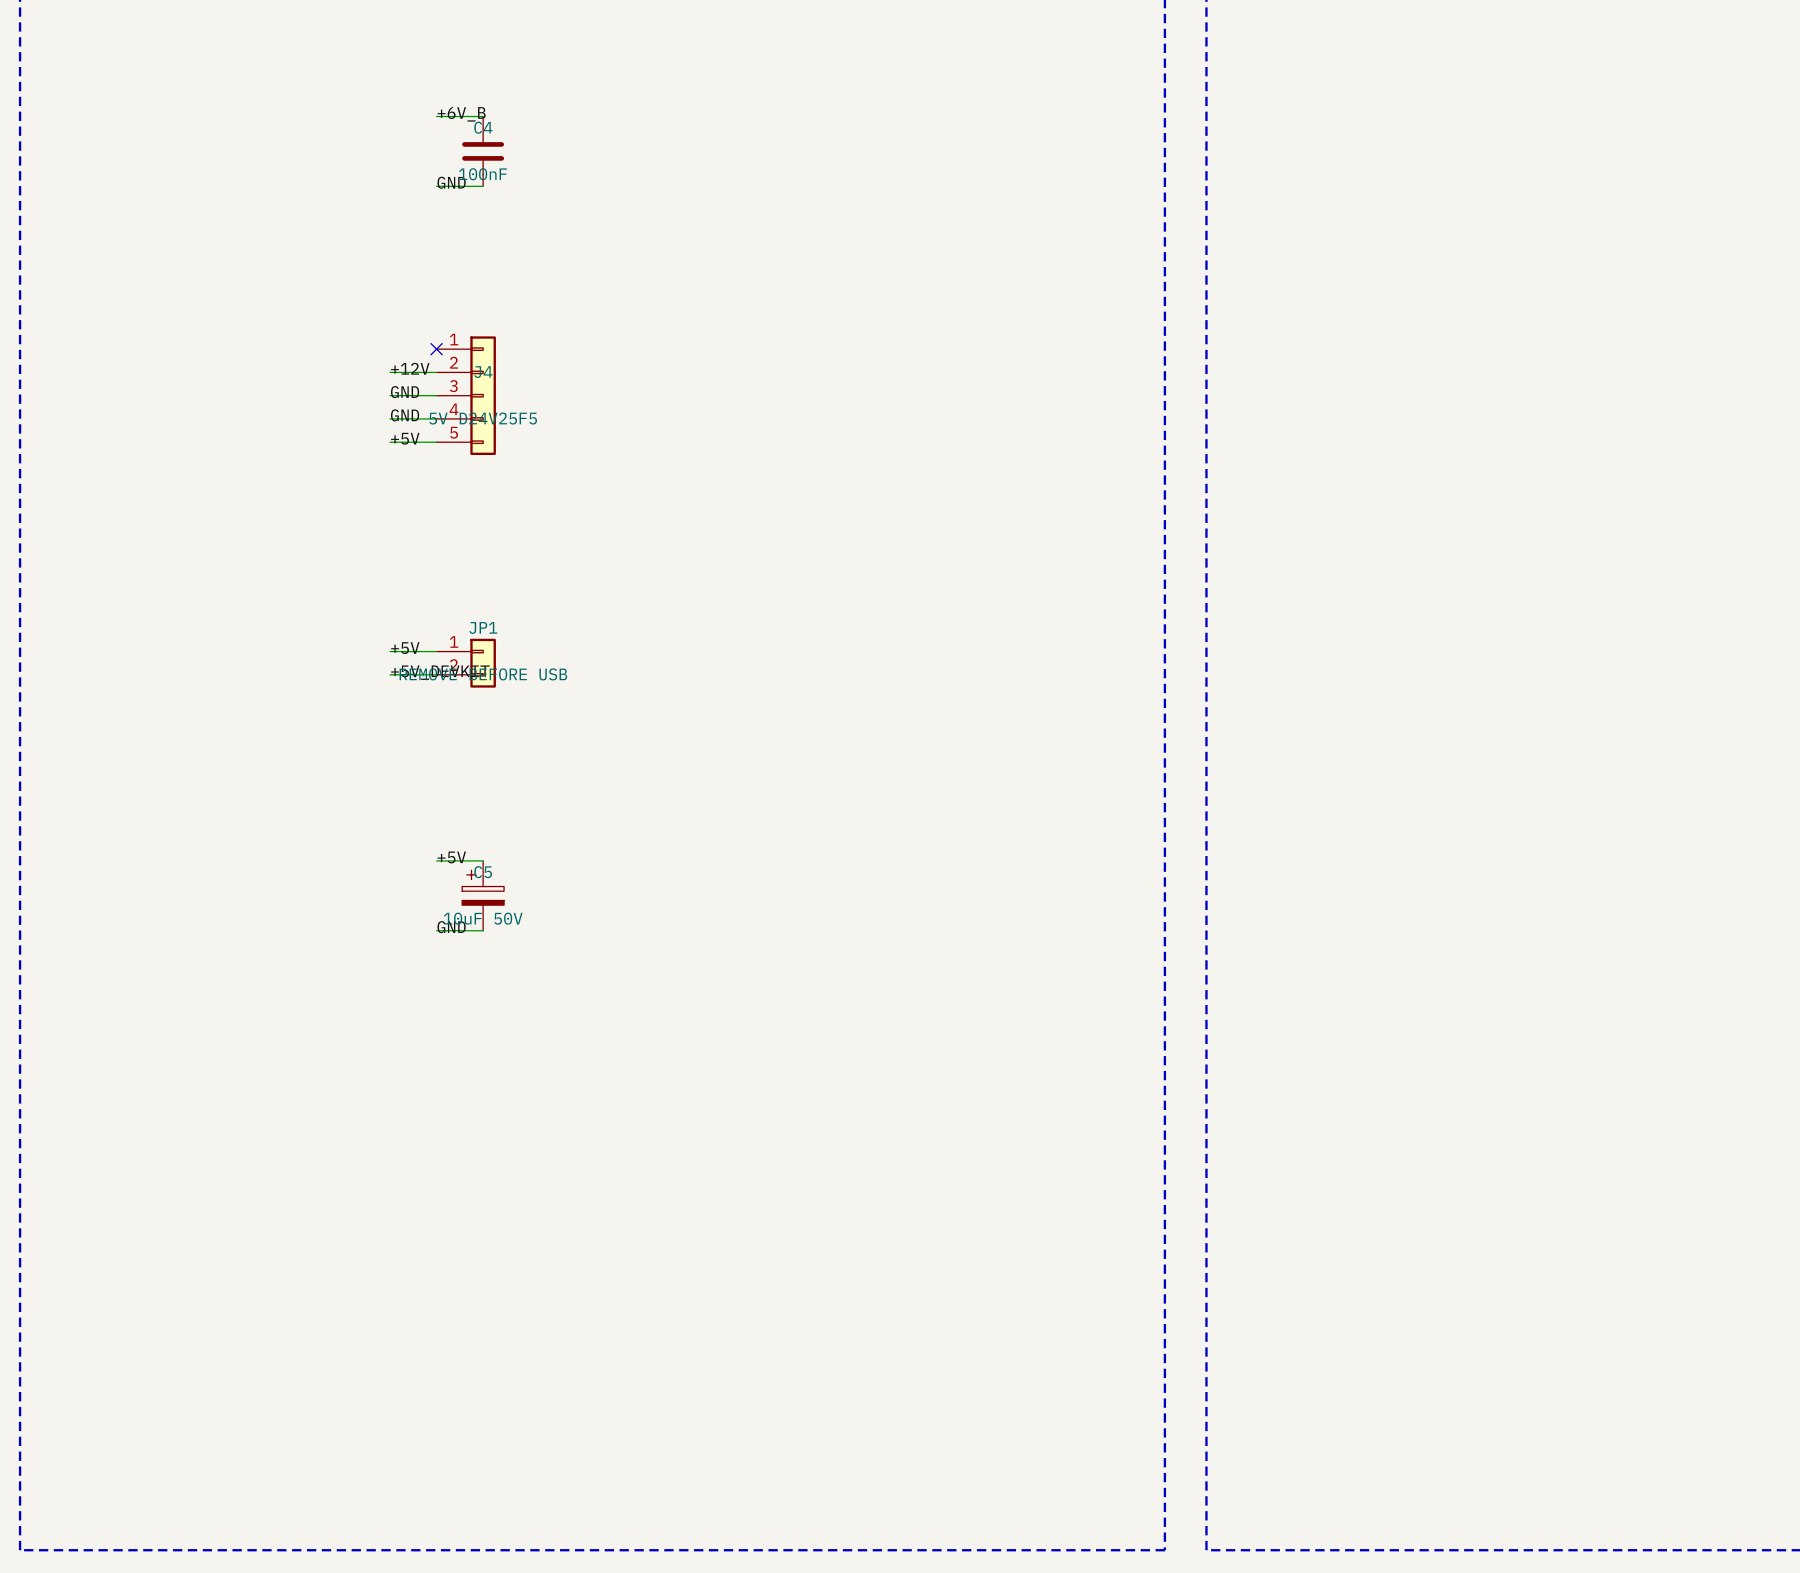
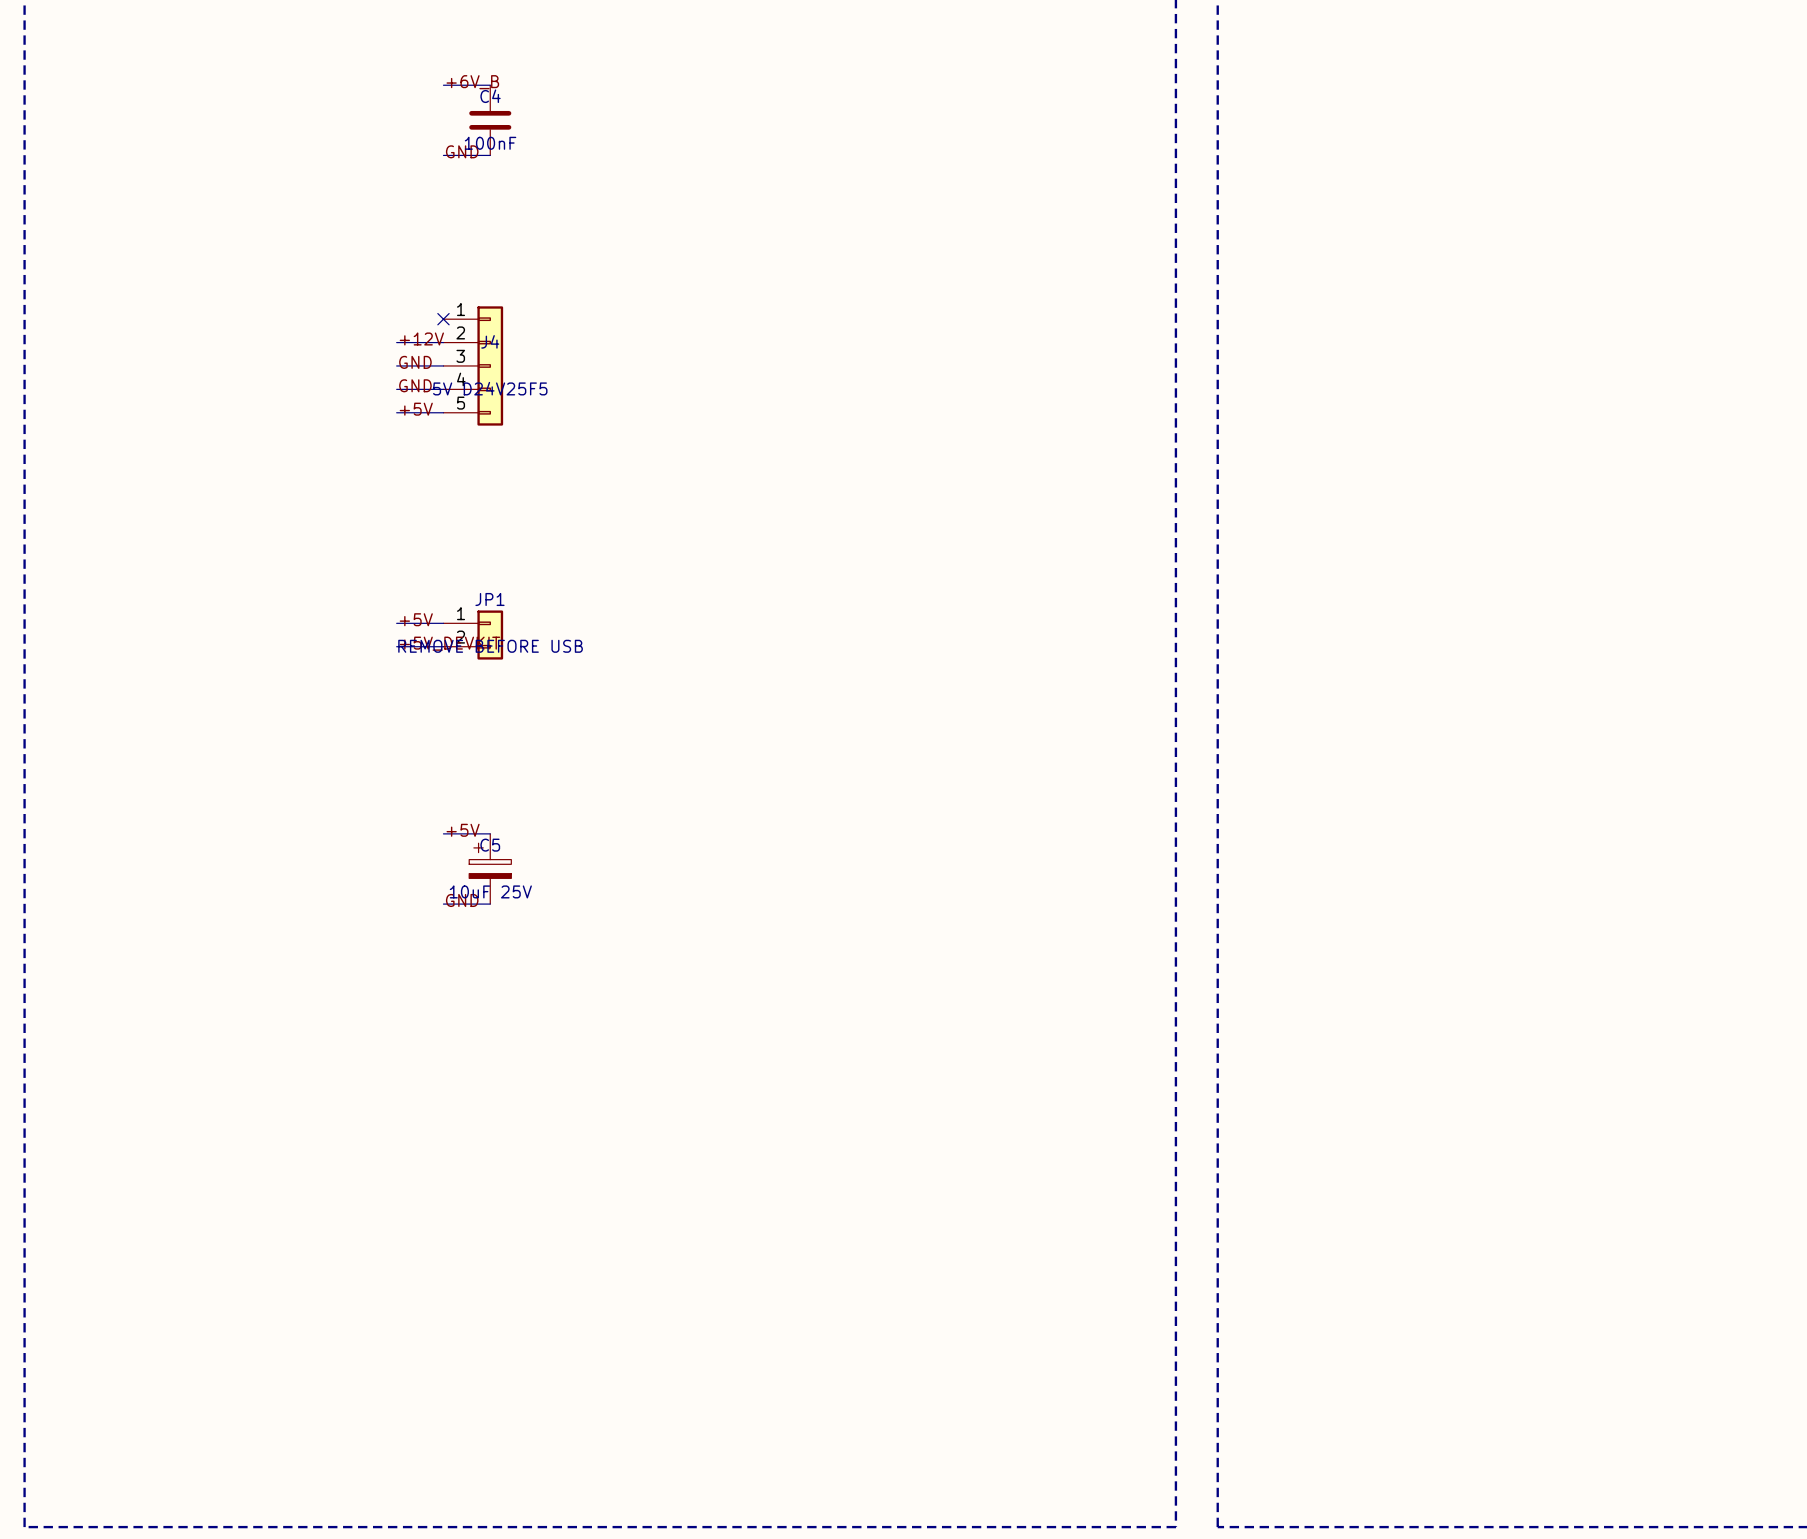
C5 value: 10uF 50V (483, 918) -> 10uF 25V (490, 891)

